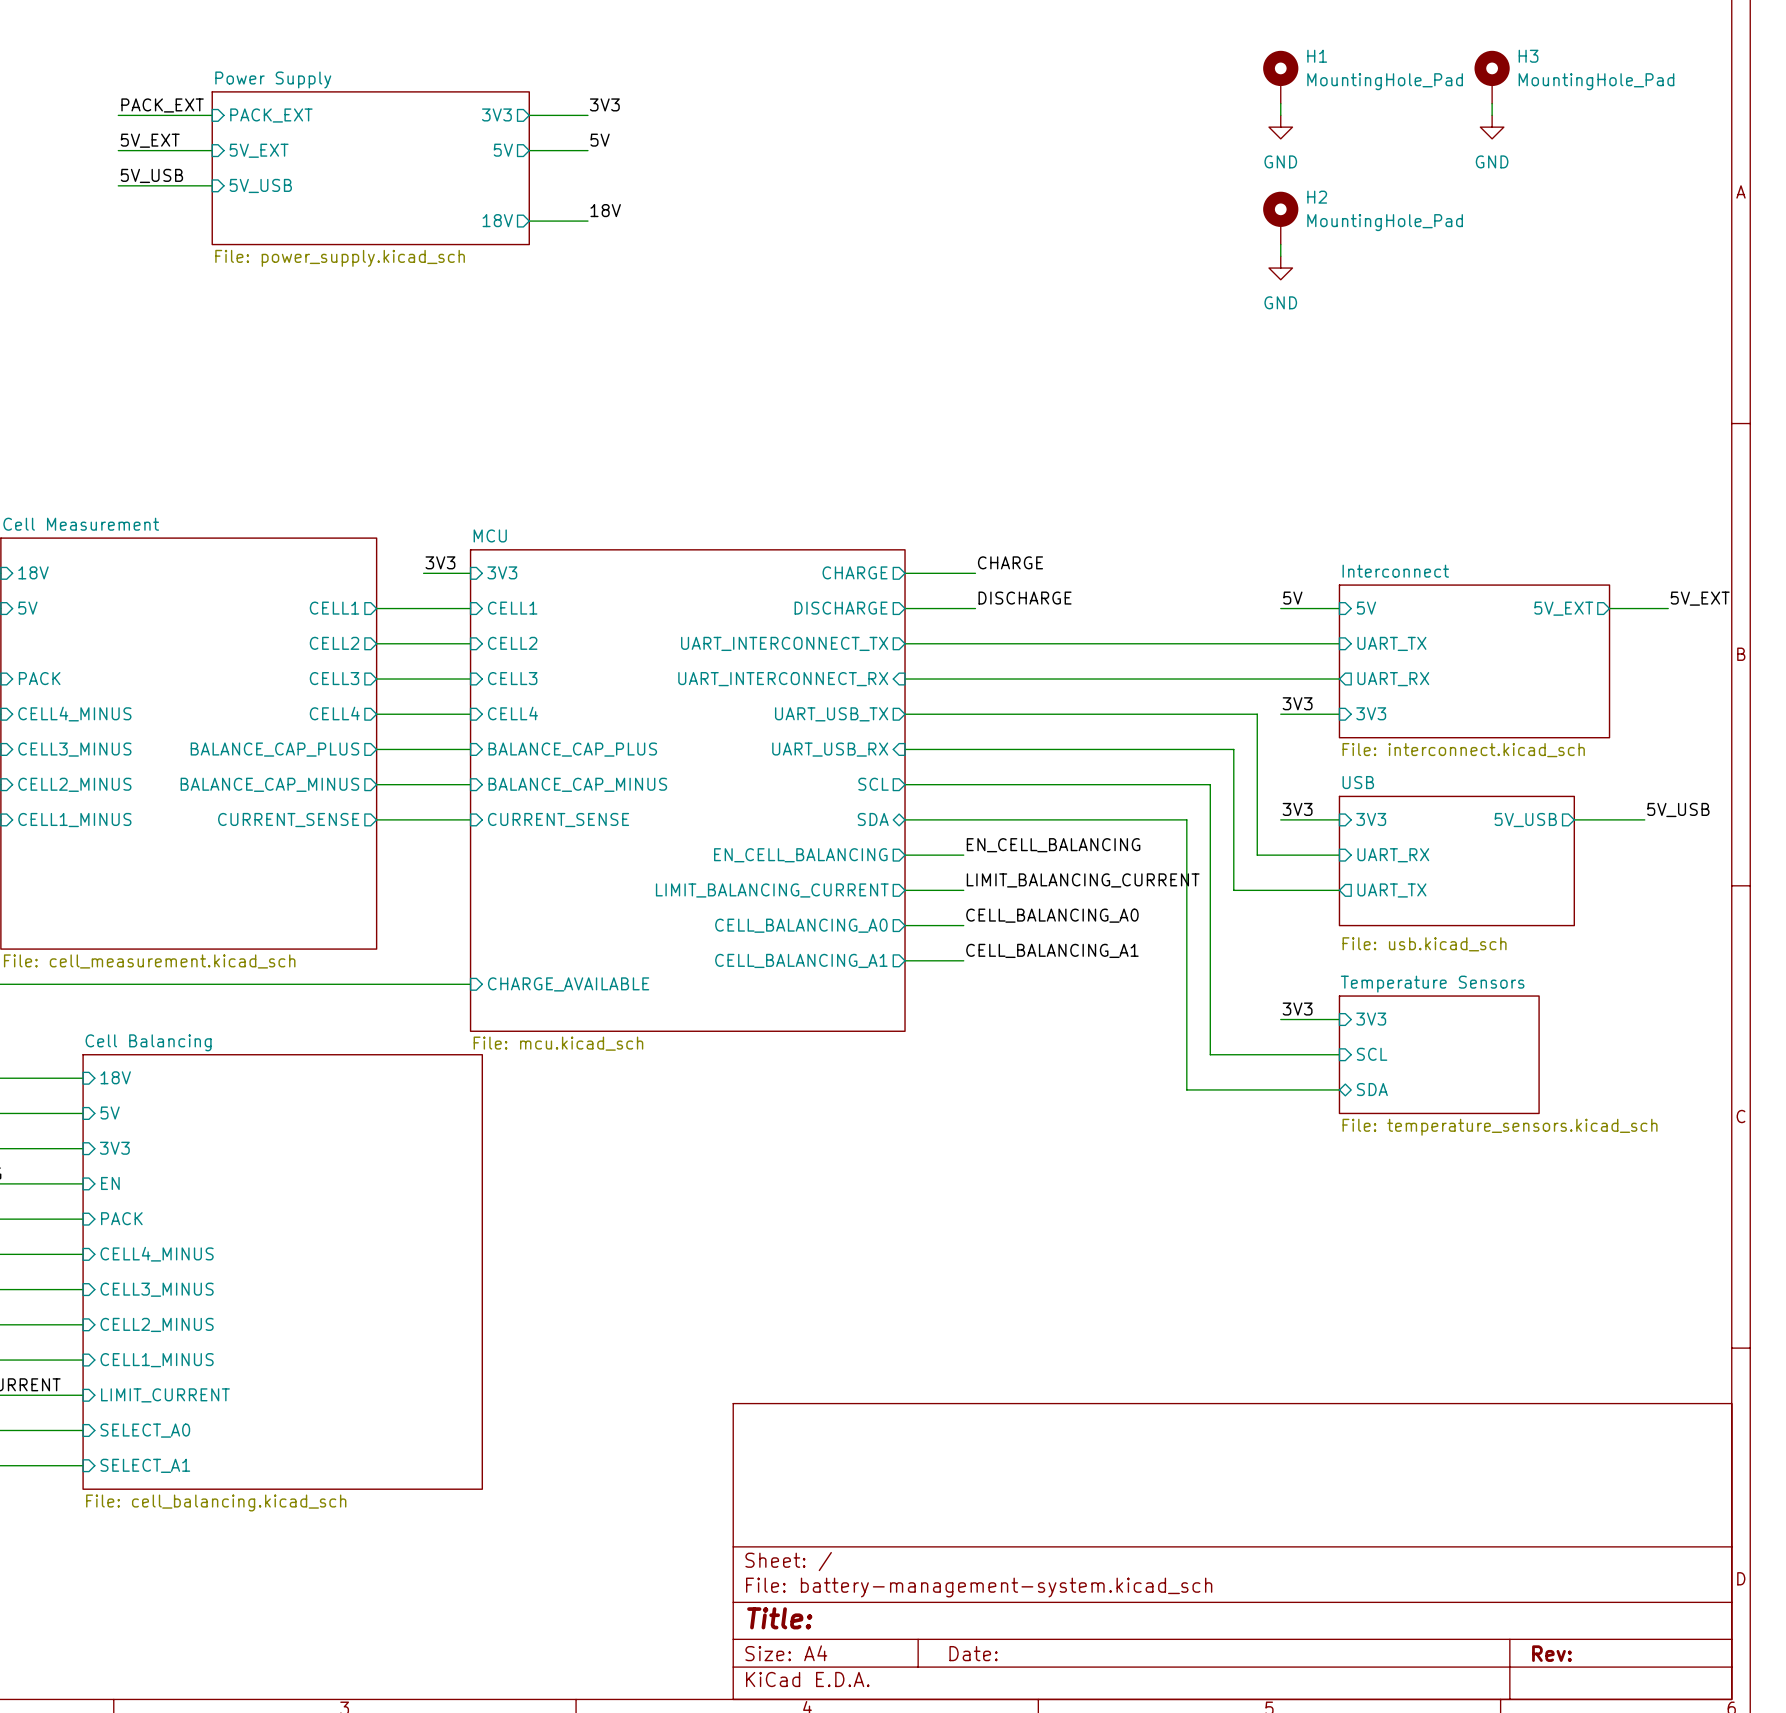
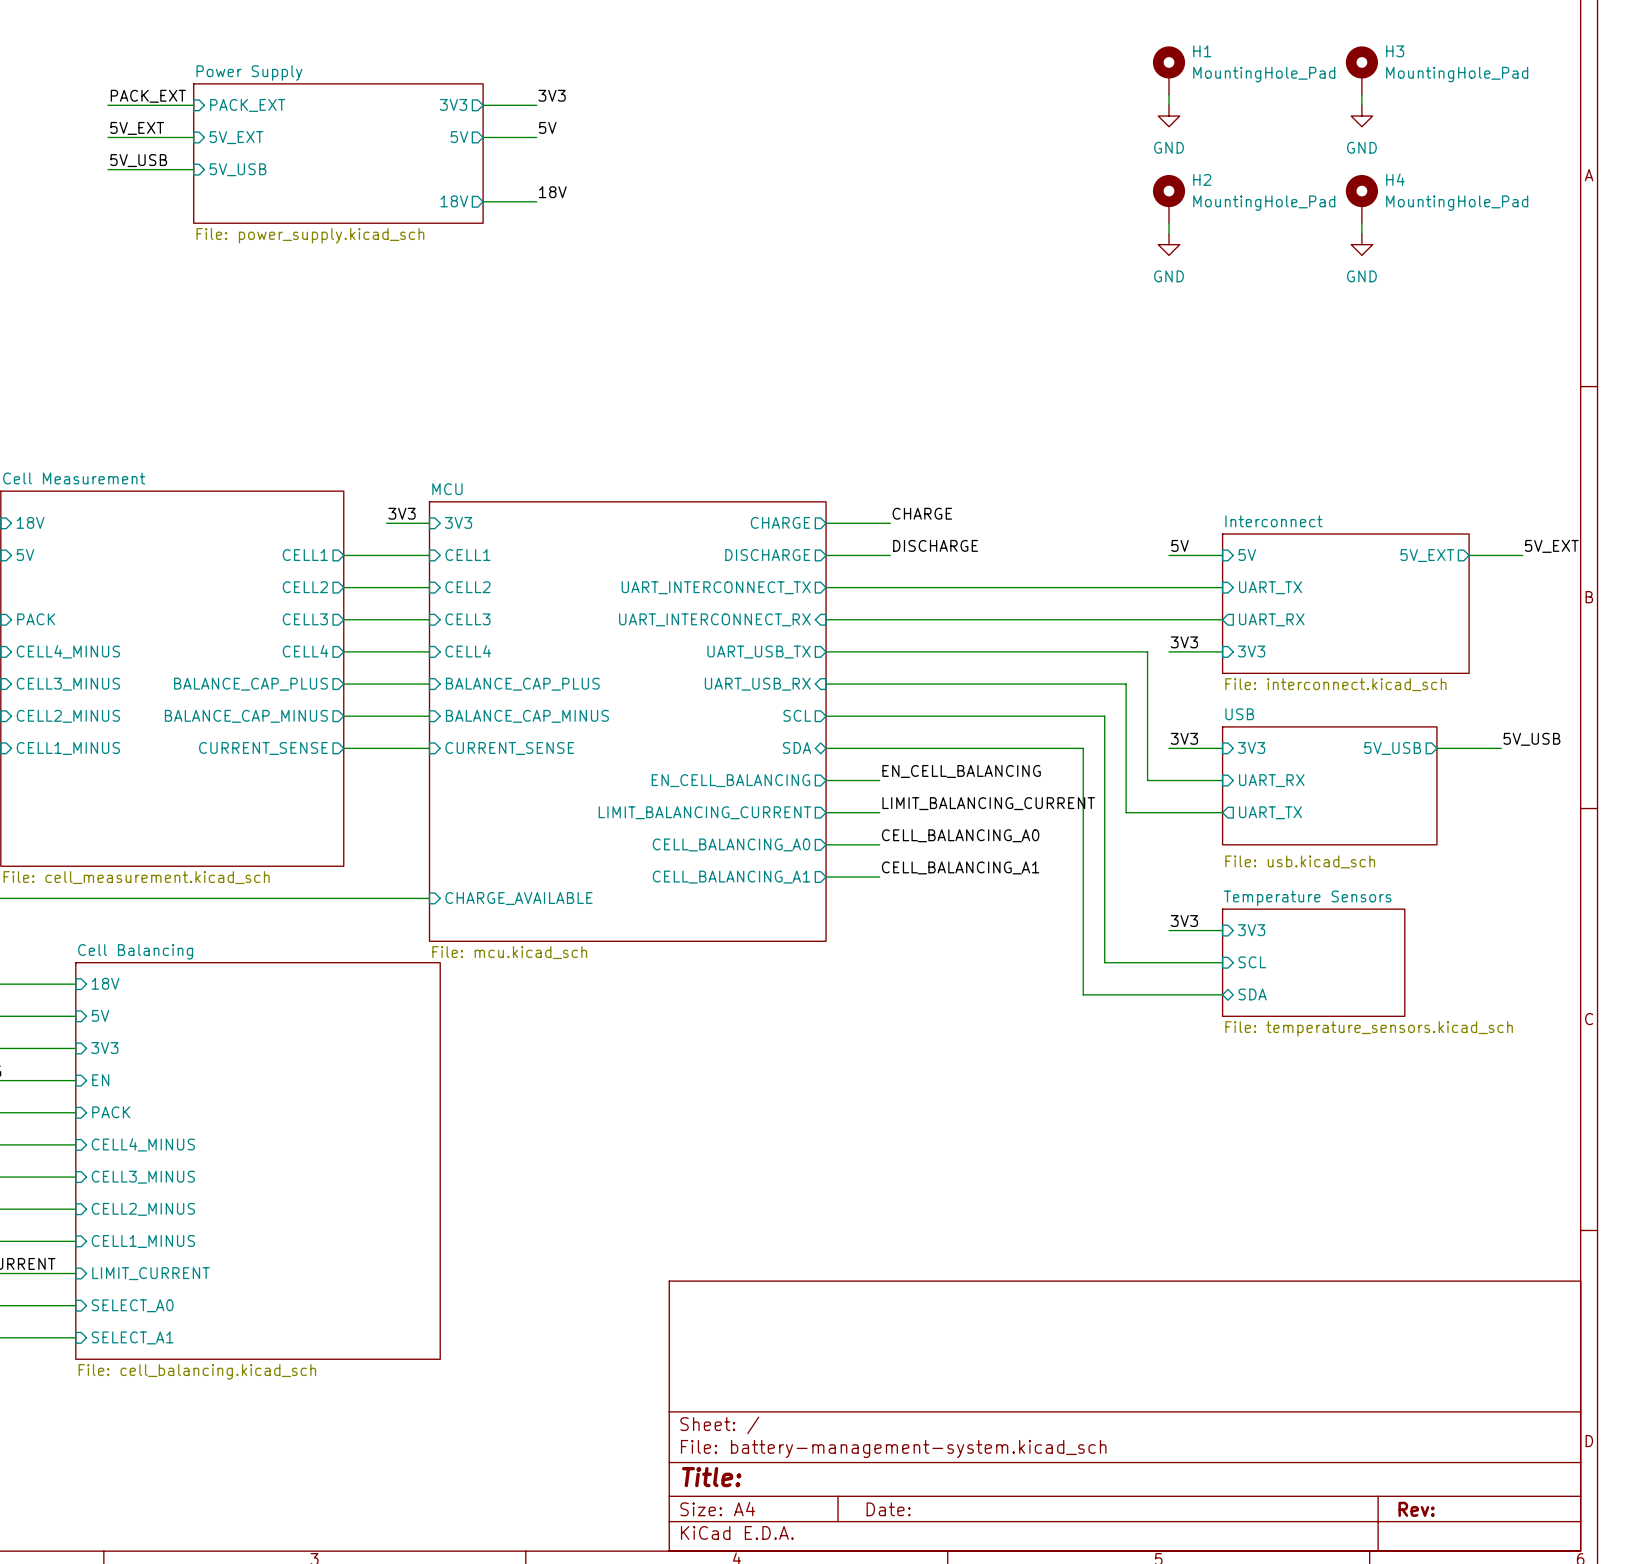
H4: none -> MountingHole_Pad (1361, 199)
wire: none -> (1361, 223) (1361, 233)
power symbol: none -> GND (1361, 244)

